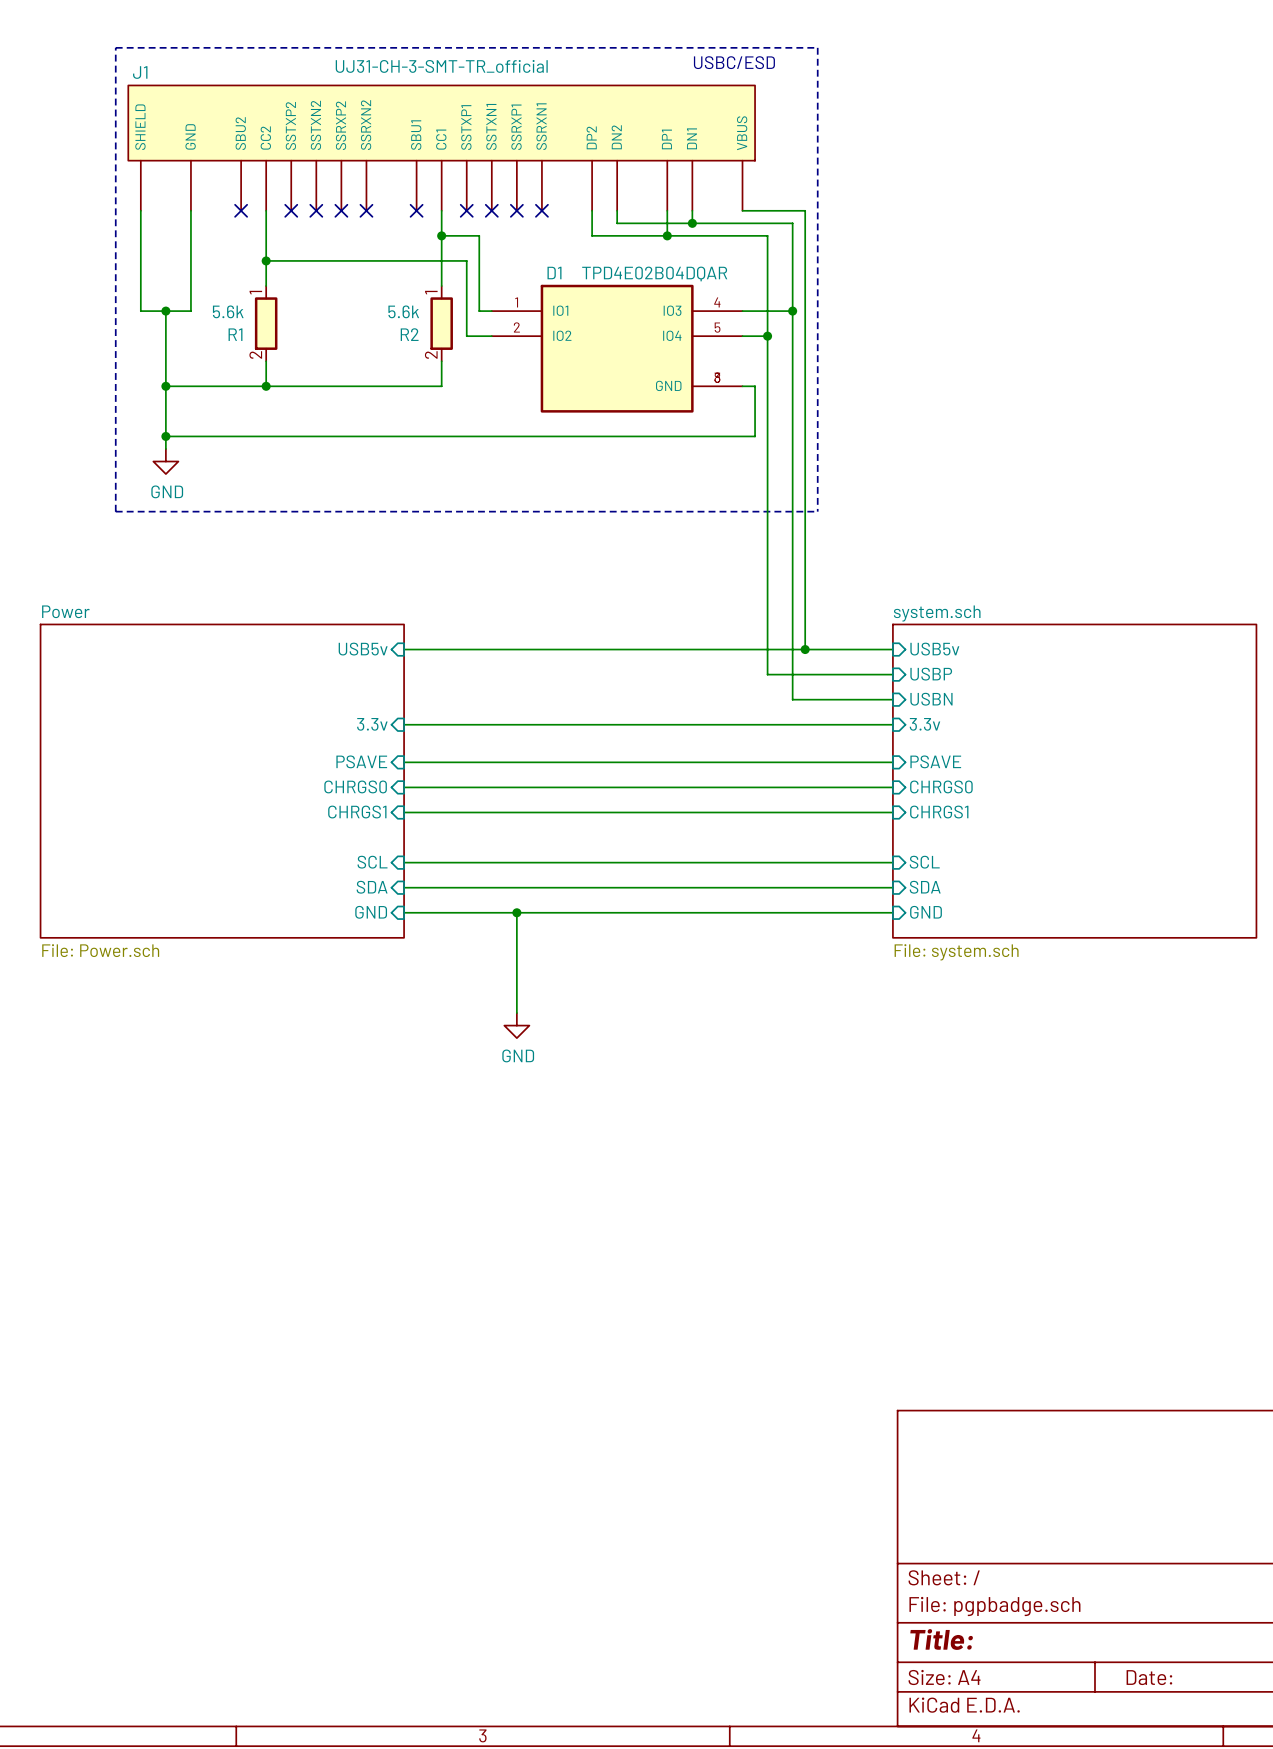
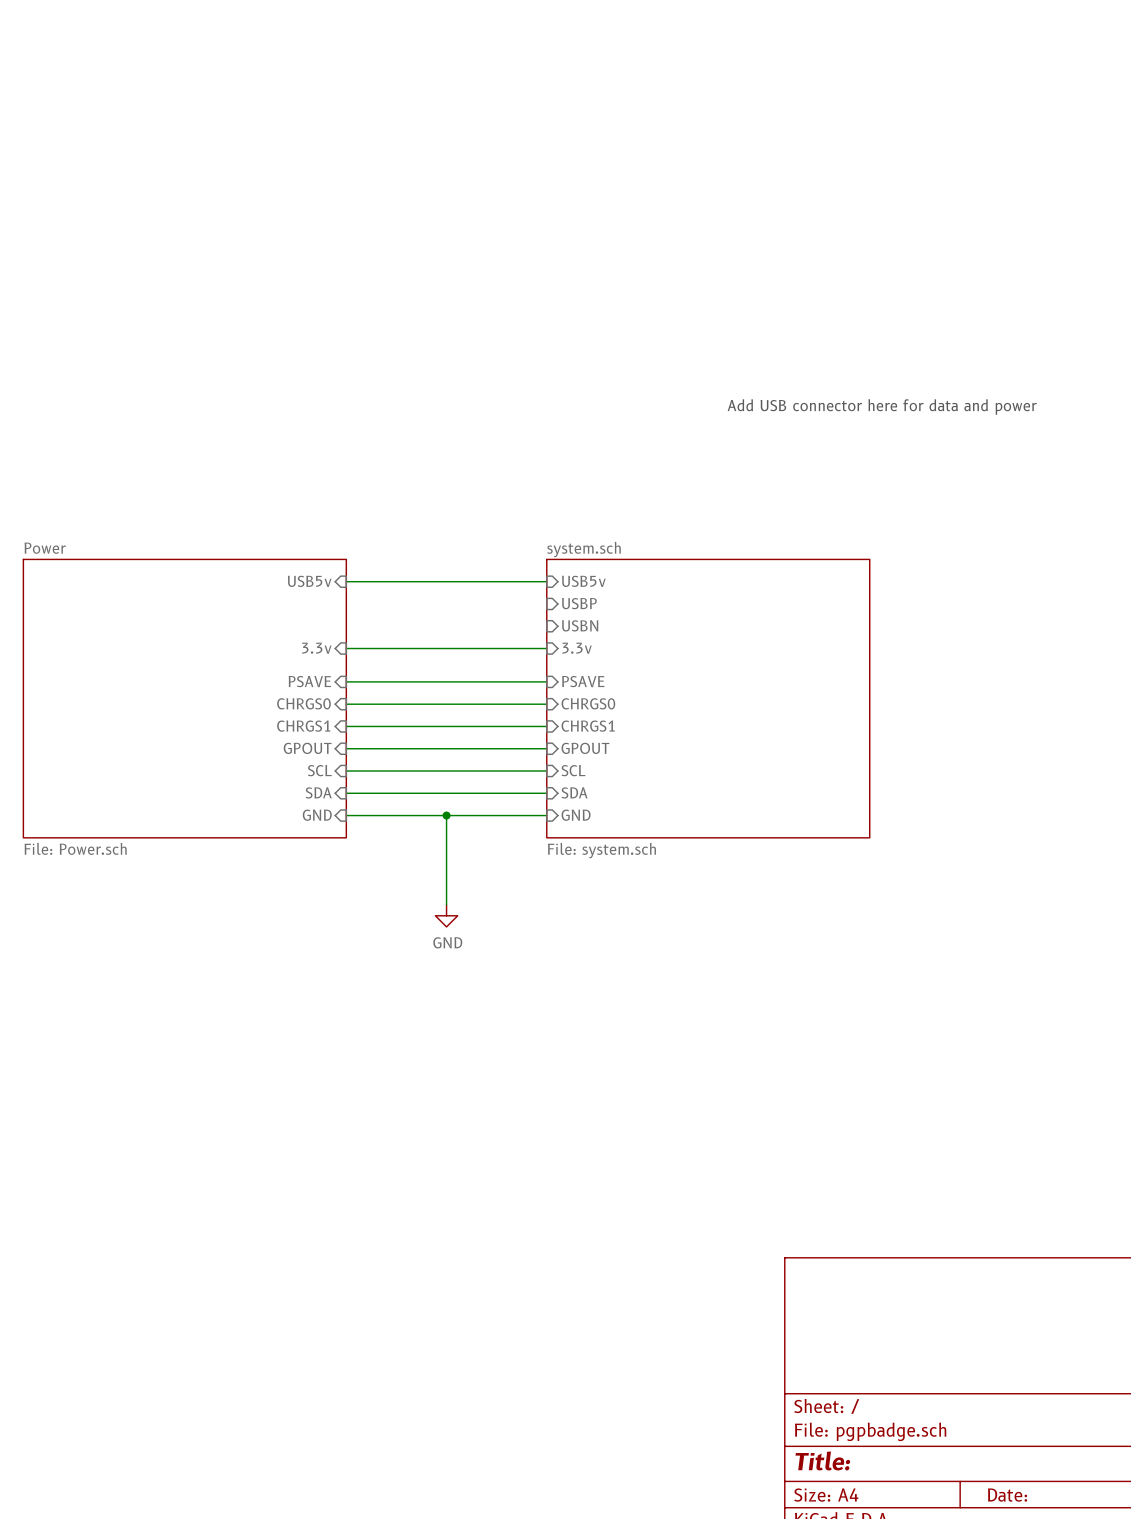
line: (115, 47) (115, 511) (817, 511) (817, 47) (115, 47) -> none
text: USBC/ESD (734, 62) -> none
J1: UJ31-CH-3-SMT-TR_official (441, 148) -> none
wire: (140, 210) (140, 311) (190, 311) (190, 210) -> none
no-connect mark: (241, 210) -> none
wire: (266, 210) (266, 286) -> none
no-connect mark: (291, 210) -> none
no-connect mark: (316, 210) -> none
no-connect mark: (341, 210) -> none
no-connect mark: (366, 210) -> none
no-connect mark: (416, 210) -> none
wire: (441, 210) (441, 286) -> none
no-connect mark: (466, 210) -> none
no-connect mark: (491, 210) -> none
no-connect mark: (516, 210) -> none
no-connect mark: (541, 210) -> none
wire: (592, 210) (592, 235) (767, 235) (767, 674) (892, 674) -> none
wire: (617, 210) (617, 223) (792, 223) (792, 699) (892, 699) -> none
wire: (667, 210) (667, 235) -> none
wire: (692, 210) (692, 223) -> none
wire: (742, 210) (805, 210) (805, 649) -> none
junction: (692, 223) -> none
wire: (441, 235) (479, 235) (479, 311) (491, 311) -> none
junction: (441, 235) -> none
junction: (667, 235) -> none
wire: (266, 260) (466, 260) (466, 336) (491, 336) -> none
junction: (266, 260) -> none
wire: (165, 311) (165, 448) -> none
junction: (165, 311) -> none
wire: (742, 311) (792, 311) -> none
junction: (792, 311) -> none
R1: 5.6k (266, 323) -> none
R2: 5.6k (441, 323) -> none
wire: (742, 336) (767, 336) -> none
junction: (767, 336) -> none
D1: TPD4E02B04DQAR (617, 348) -> none
wire: (266, 361) (266, 386) -> none
wire: (441, 361) (441, 386) (165, 386) -> none
junction: (165, 386) -> none
junction: (266, 386) -> none
wire: (742, 386) (755, 386) (755, 436) (165, 436) -> none
junction: (165, 436) -> none
text: none -> Add USB connector here for data and power (882, 406)
power symbol: GND (165, 461) -> none
wire: (629, 649) (892, 649) -> none
sheet pin: none -> USB5v (583, 581)
junction: (805, 649) -> none
sheet pin: USB5v (934, 649) -> none
sheet pin: none -> USBP (579, 603)
sheet pin: USBP (931, 674) -> none
sheet pin: none -> USBN (580, 625)
sheet pin: USBN (931, 699) -> none
wire: (629, 724) (892, 724) -> none
sheet pin: none -> 3.3v (577, 648)
sheet pin: 3.3v (925, 724) -> none
sheet pin: none -> PSAVE (583, 681)
sheet pin: PSAVE (935, 761) -> none
wire: (629, 762) (892, 762) -> none
sheet system.sch: none -> File: system.sch (708, 698)
sheet system.sch: File: system.sch (1074, 781) -> none
sheet pin: none -> CHRGS0 (588, 703)
sheet pin: CHRGS0 (941, 786) -> none
wire: (629, 787) (892, 787) -> none
wire: (629, 812) (892, 812) -> none
sheet pin: none -> CHRGS1 (588, 726)
sheet pin: CHRGS1 (939, 812) -> none
sheet pin: none -> GPOUT (307, 748)
wire: none -> (346, 748) (546, 748)
sheet pin: none -> GPOUT (585, 748)
wire: (629, 862) (892, 862) -> none
sheet pin: none -> SCL (573, 770)
sheet pin: SCL (924, 862) -> none
wire: (629, 887) (892, 887) -> none
sheet pin: none -> SDA (574, 792)
sheet pin: SDA (925, 887) -> none
wire: (629, 912) (892, 912) -> none
sheet pin: none -> GND (576, 815)
sheet pin: GND (926, 912) -> none

